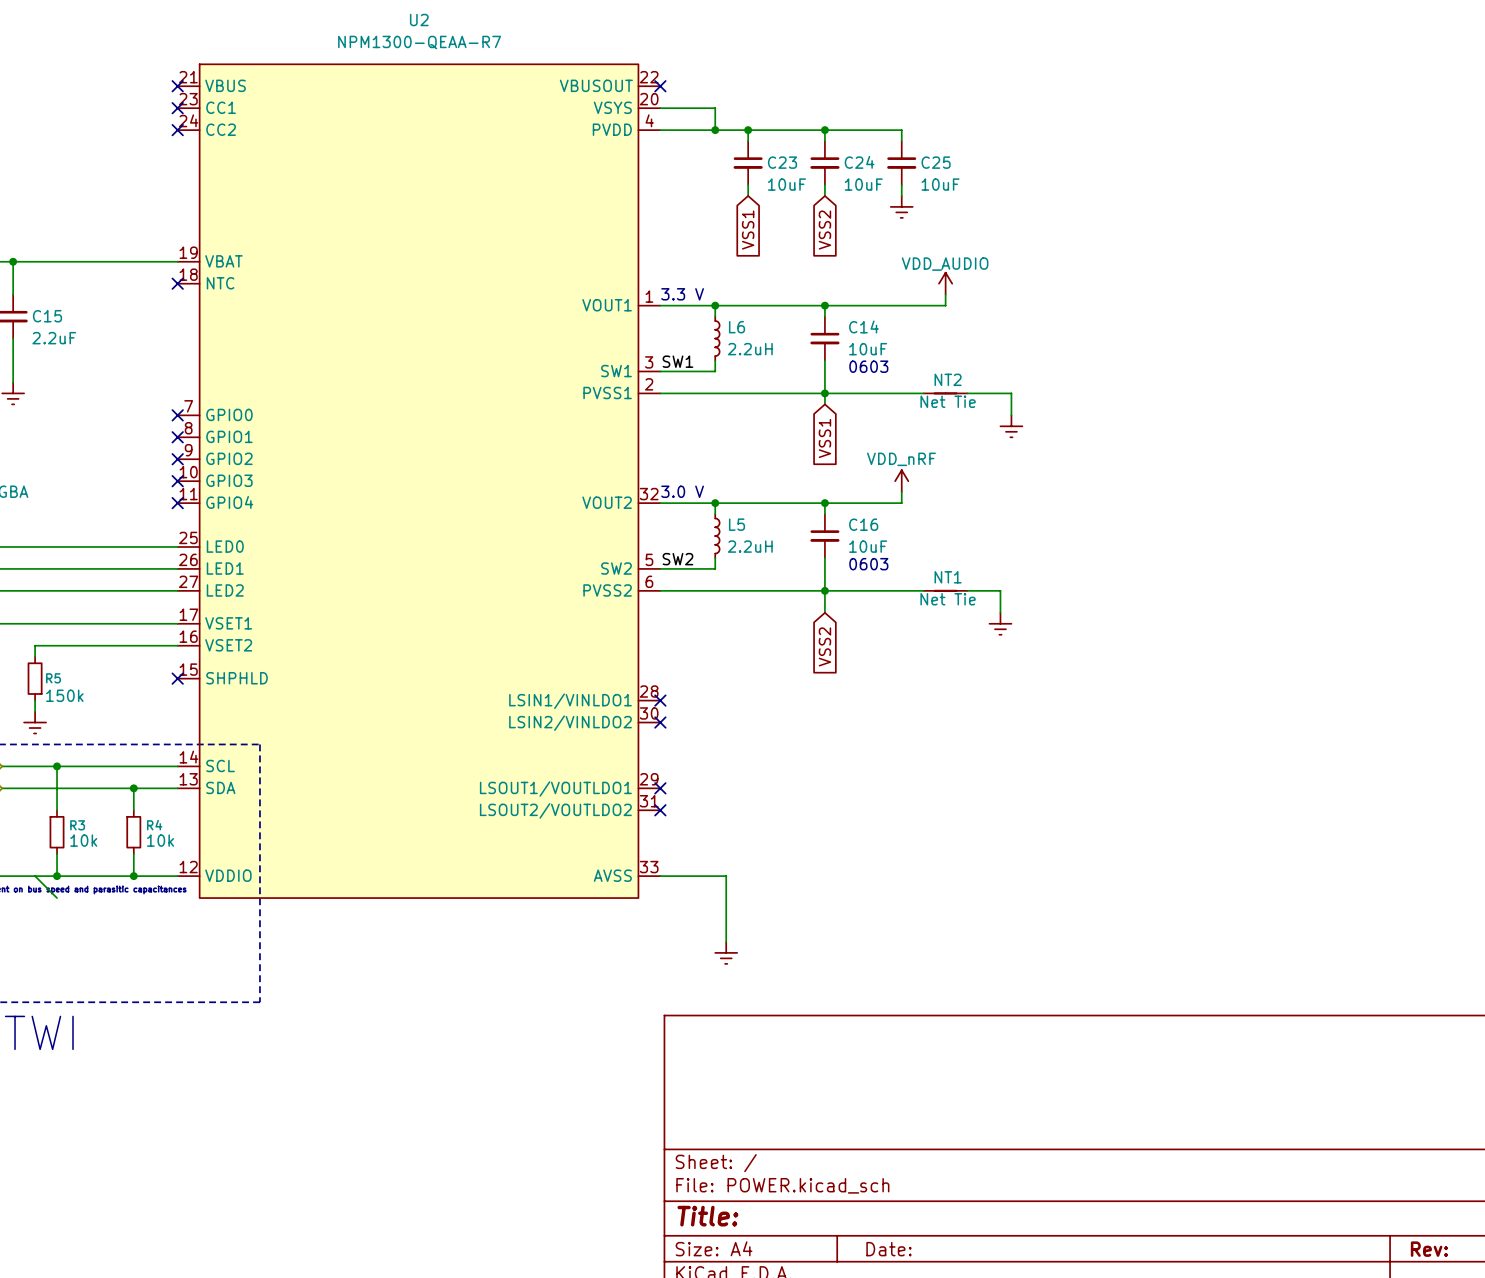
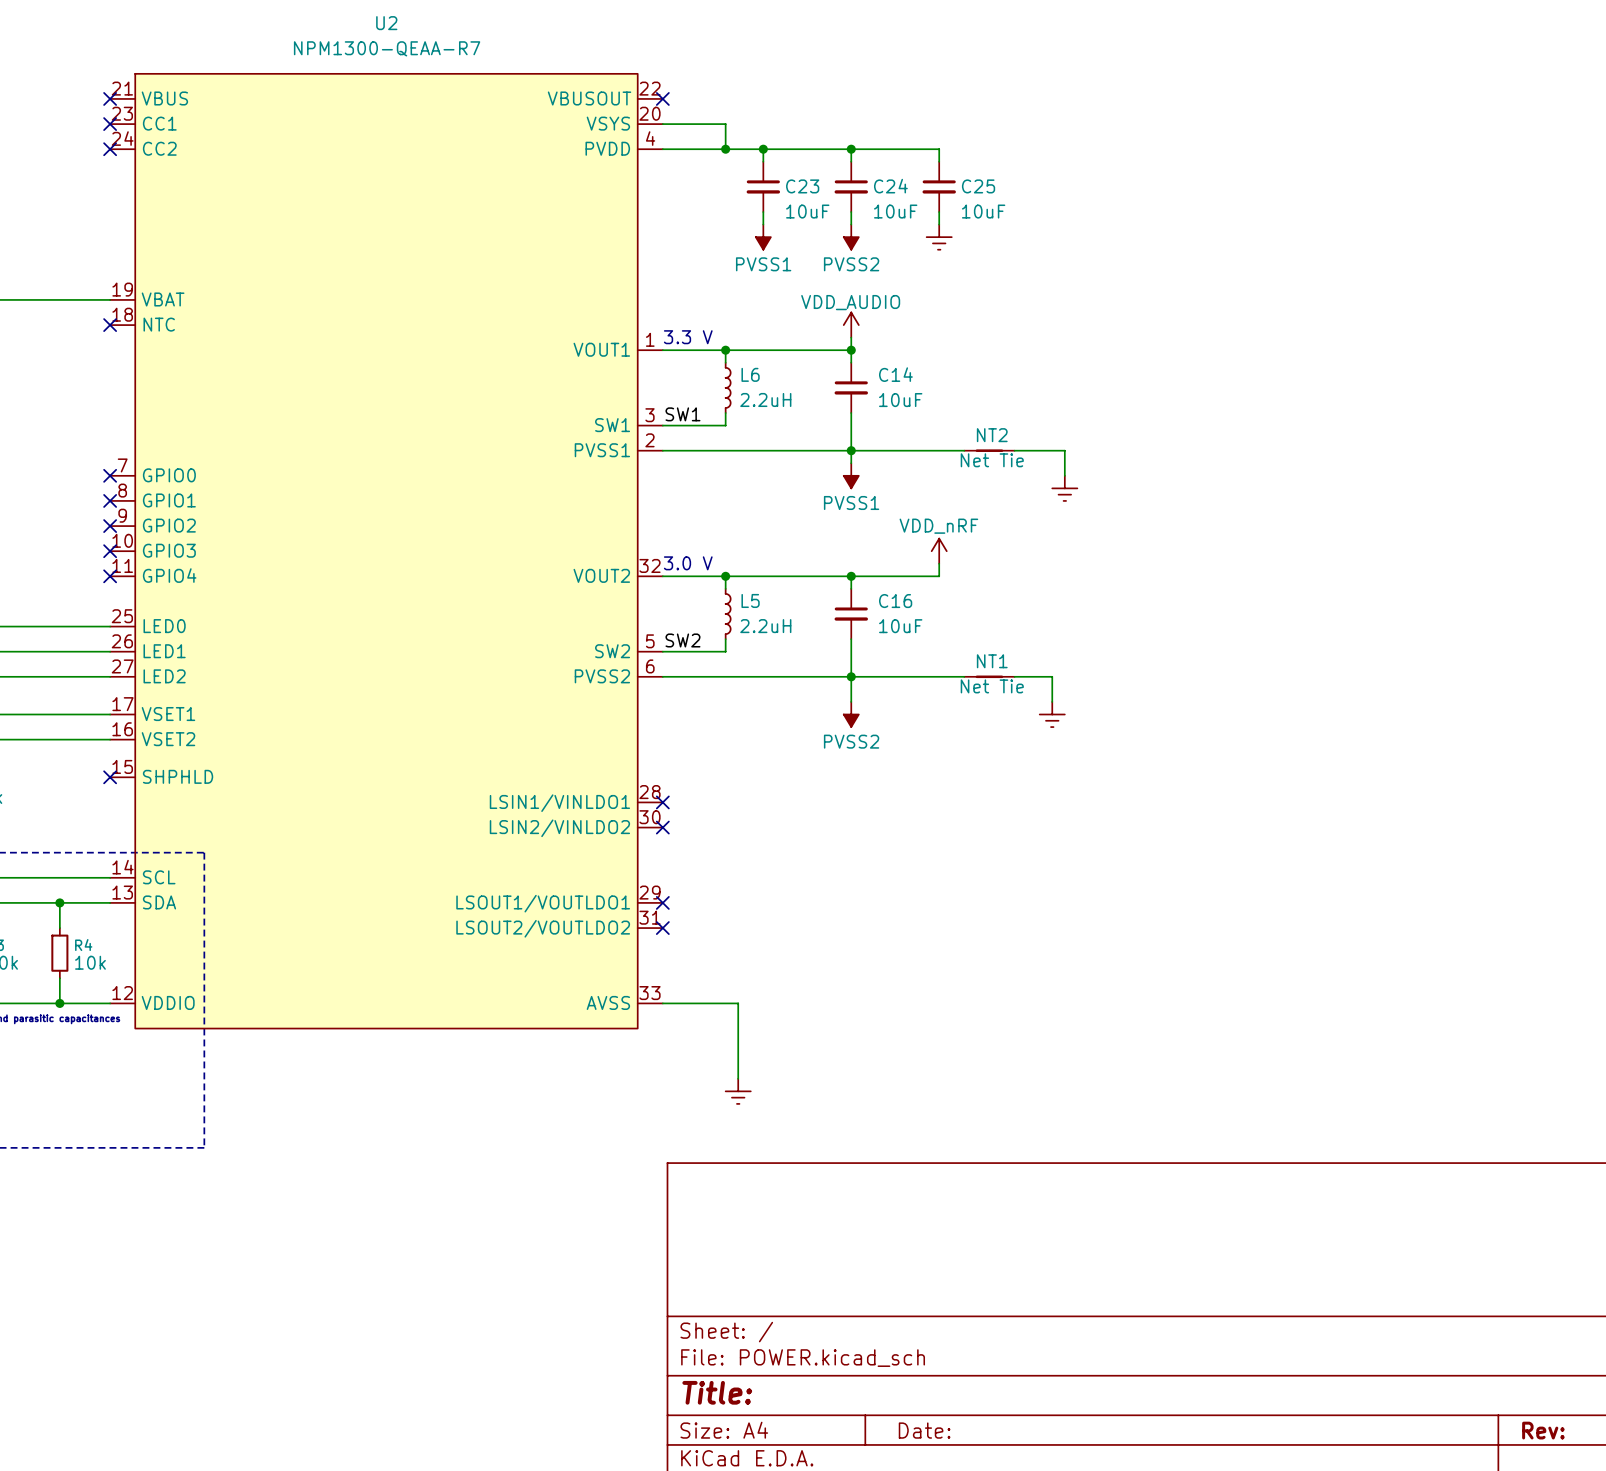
power symbol: none -> PVSS1 (763, 237)
power symbol: none -> PVSS2 (851, 237)
global label: VSS1 (748, 230) -> none
global label: VSS2 (824, 230) -> none
power symbol position: VDD_AUDIO (945, 283) -> VDD_AUDIO (851, 325)
wire: (945, 294) (945, 305) (824, 305) -> (851, 337) (851, 350)
text: 0603 (868, 366) -> none
power symbol: none -> PVSS1 (851, 475)
global label: VSS1 (824, 438) -> none
text: 0603 (868, 564) -> none
power symbol: none -> PVSS2 (851, 714)
global label: VSS2 (824, 646) -> none

